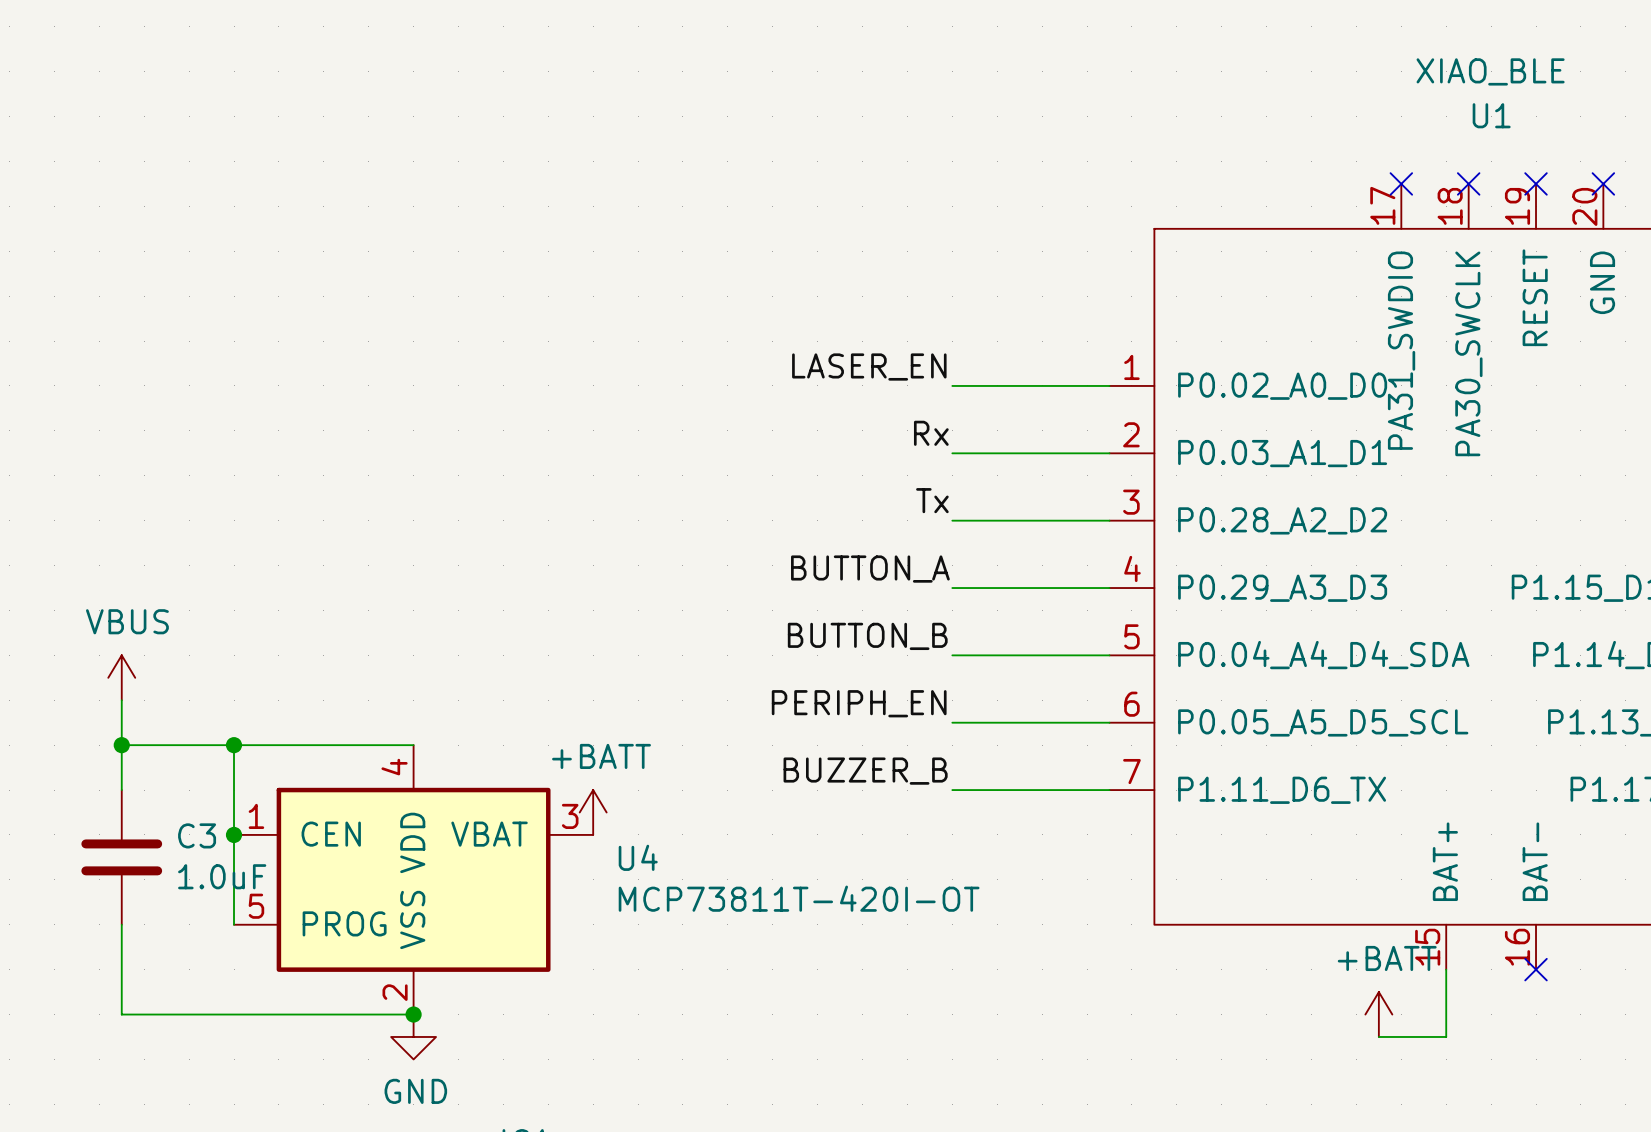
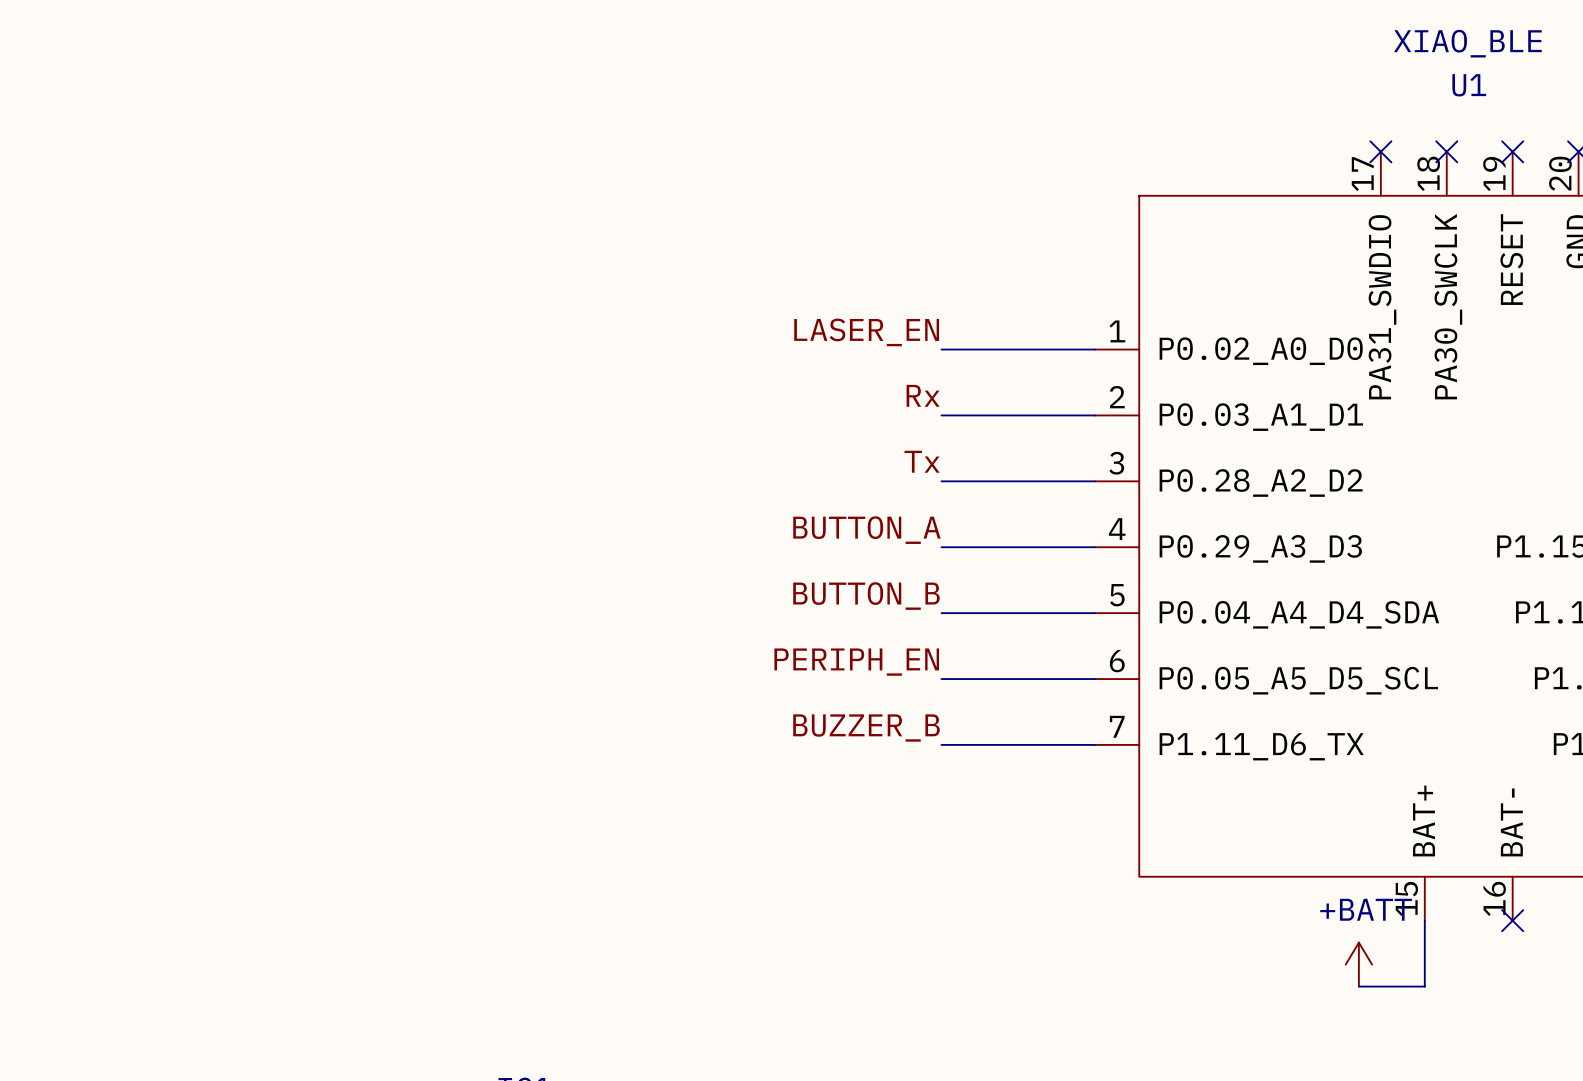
power symbol: VBUS (121, 677) -> none
wire: (121, 700) (121, 790) -> none
wire: (121, 745) (413, 745) -> none
junction: (121, 745) -> none
wire: (234, 745) (234, 924) -> none
junction: (234, 745) -> none
power symbol: +BATT (593, 812) -> none
junction: (234, 834) -> none
C3: 1.0uF (121, 857) -> none
U4: MCP73811T-420I-OT (413, 879) -> none
wire: (121, 924) (121, 1014) (413, 1014) -> none
junction: (413, 1014) -> none
power symbol: GND (413, 1036) -> none

